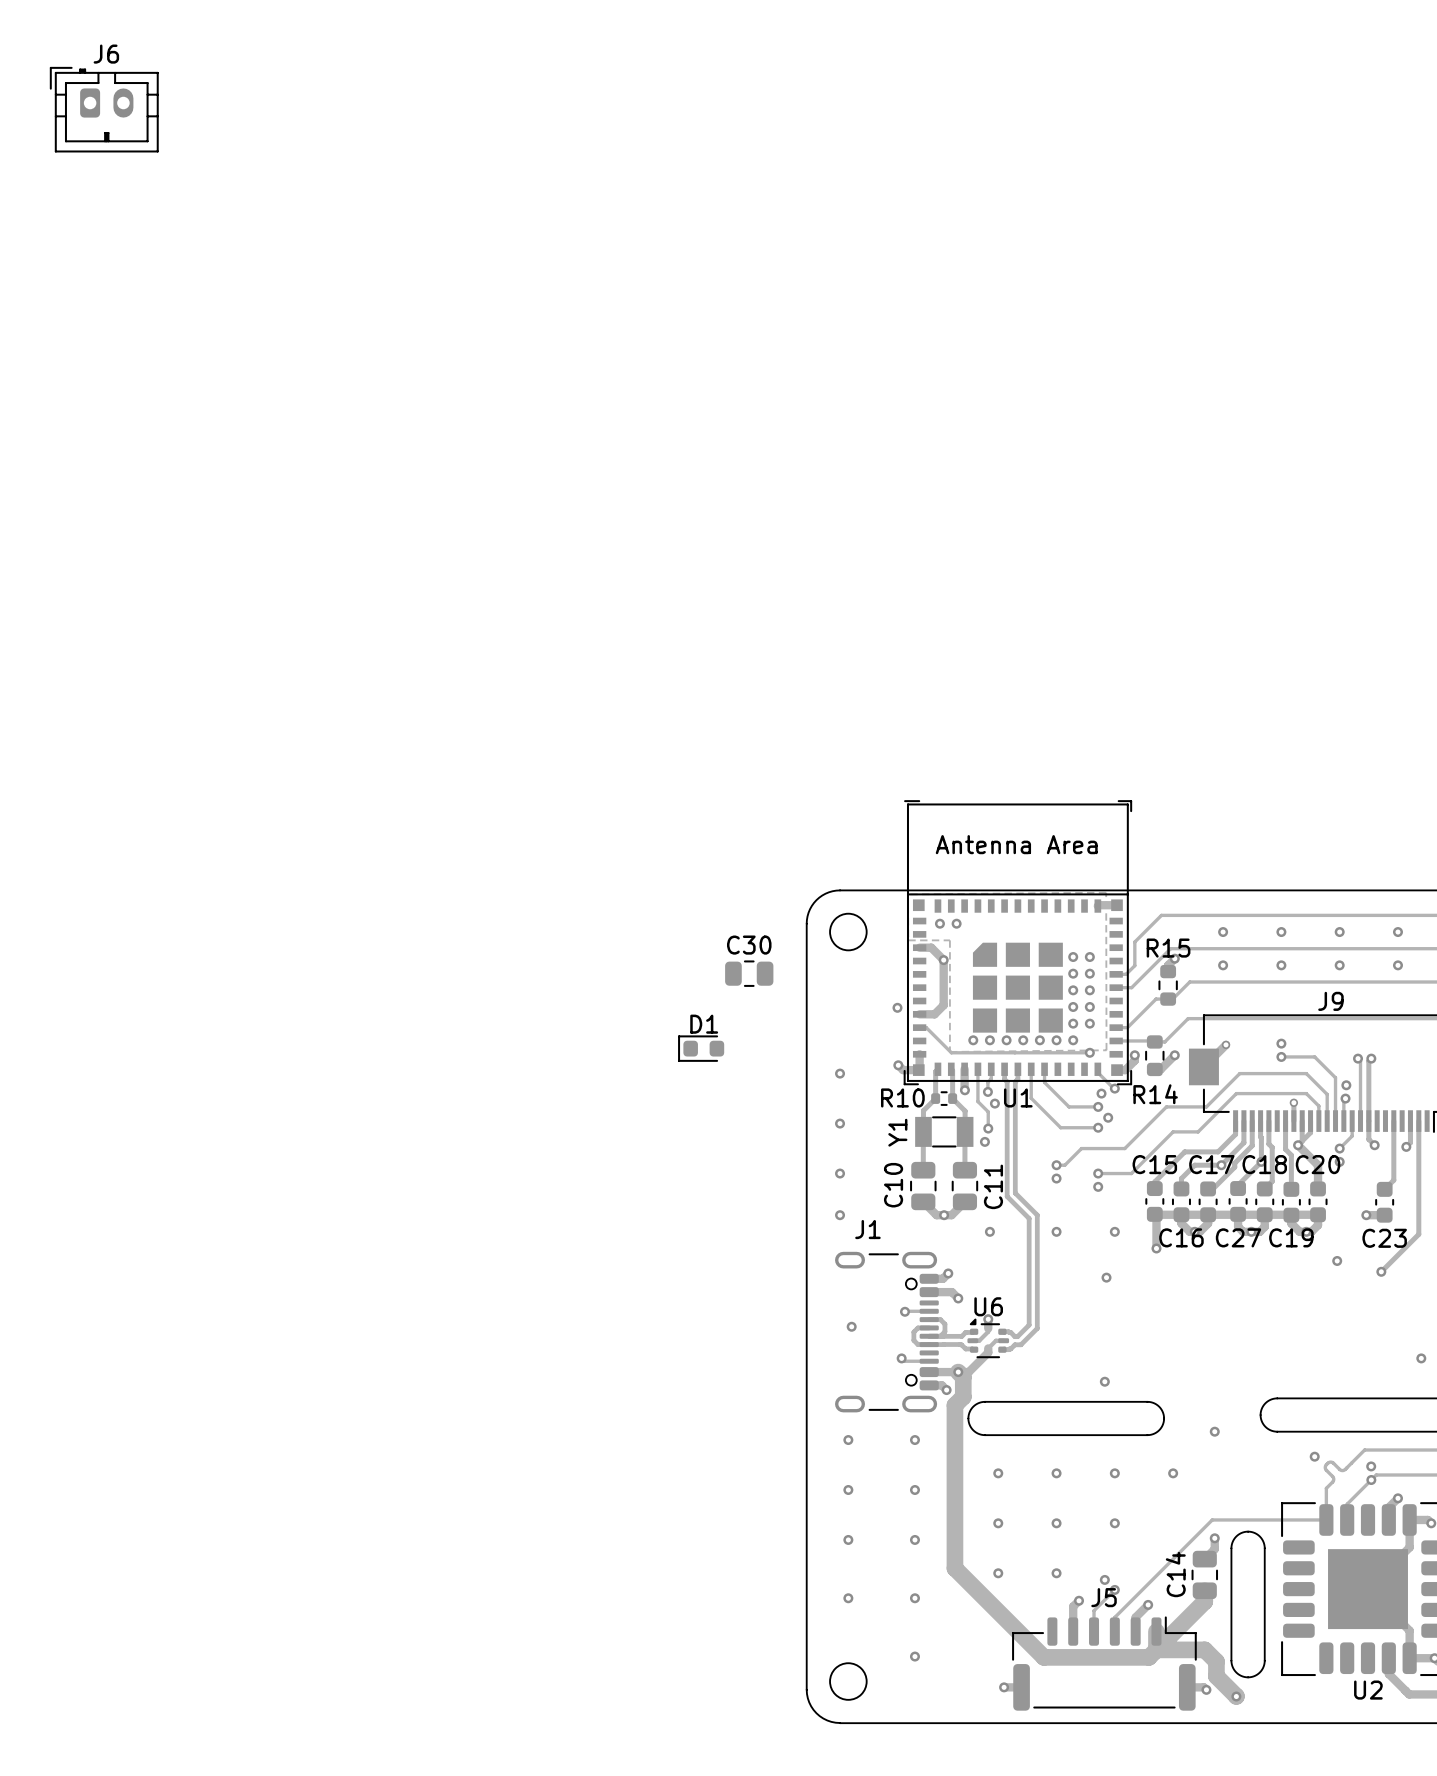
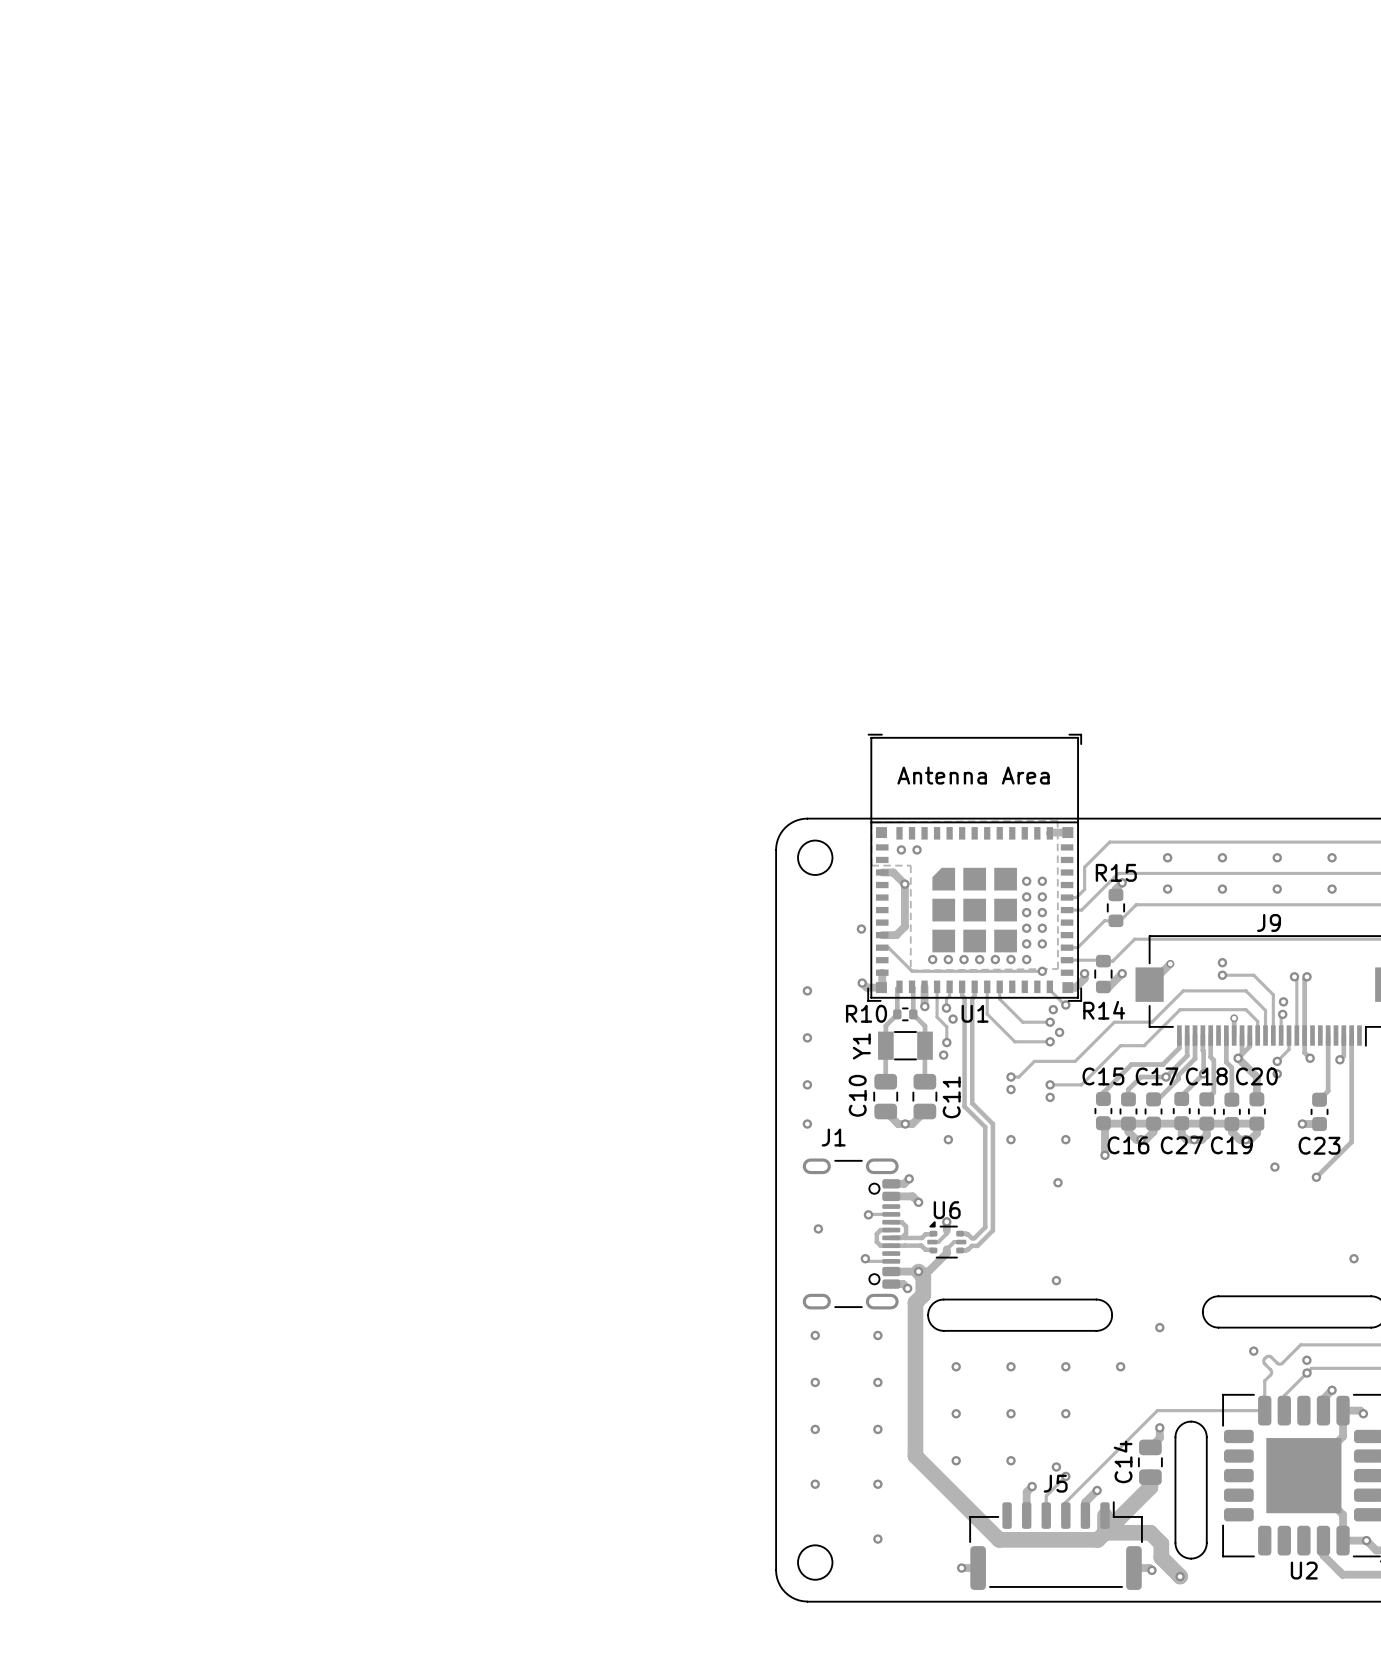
J6: (104, 109) -> none
C30: (749, 973) -> none
D1: (701, 1048) -> none

